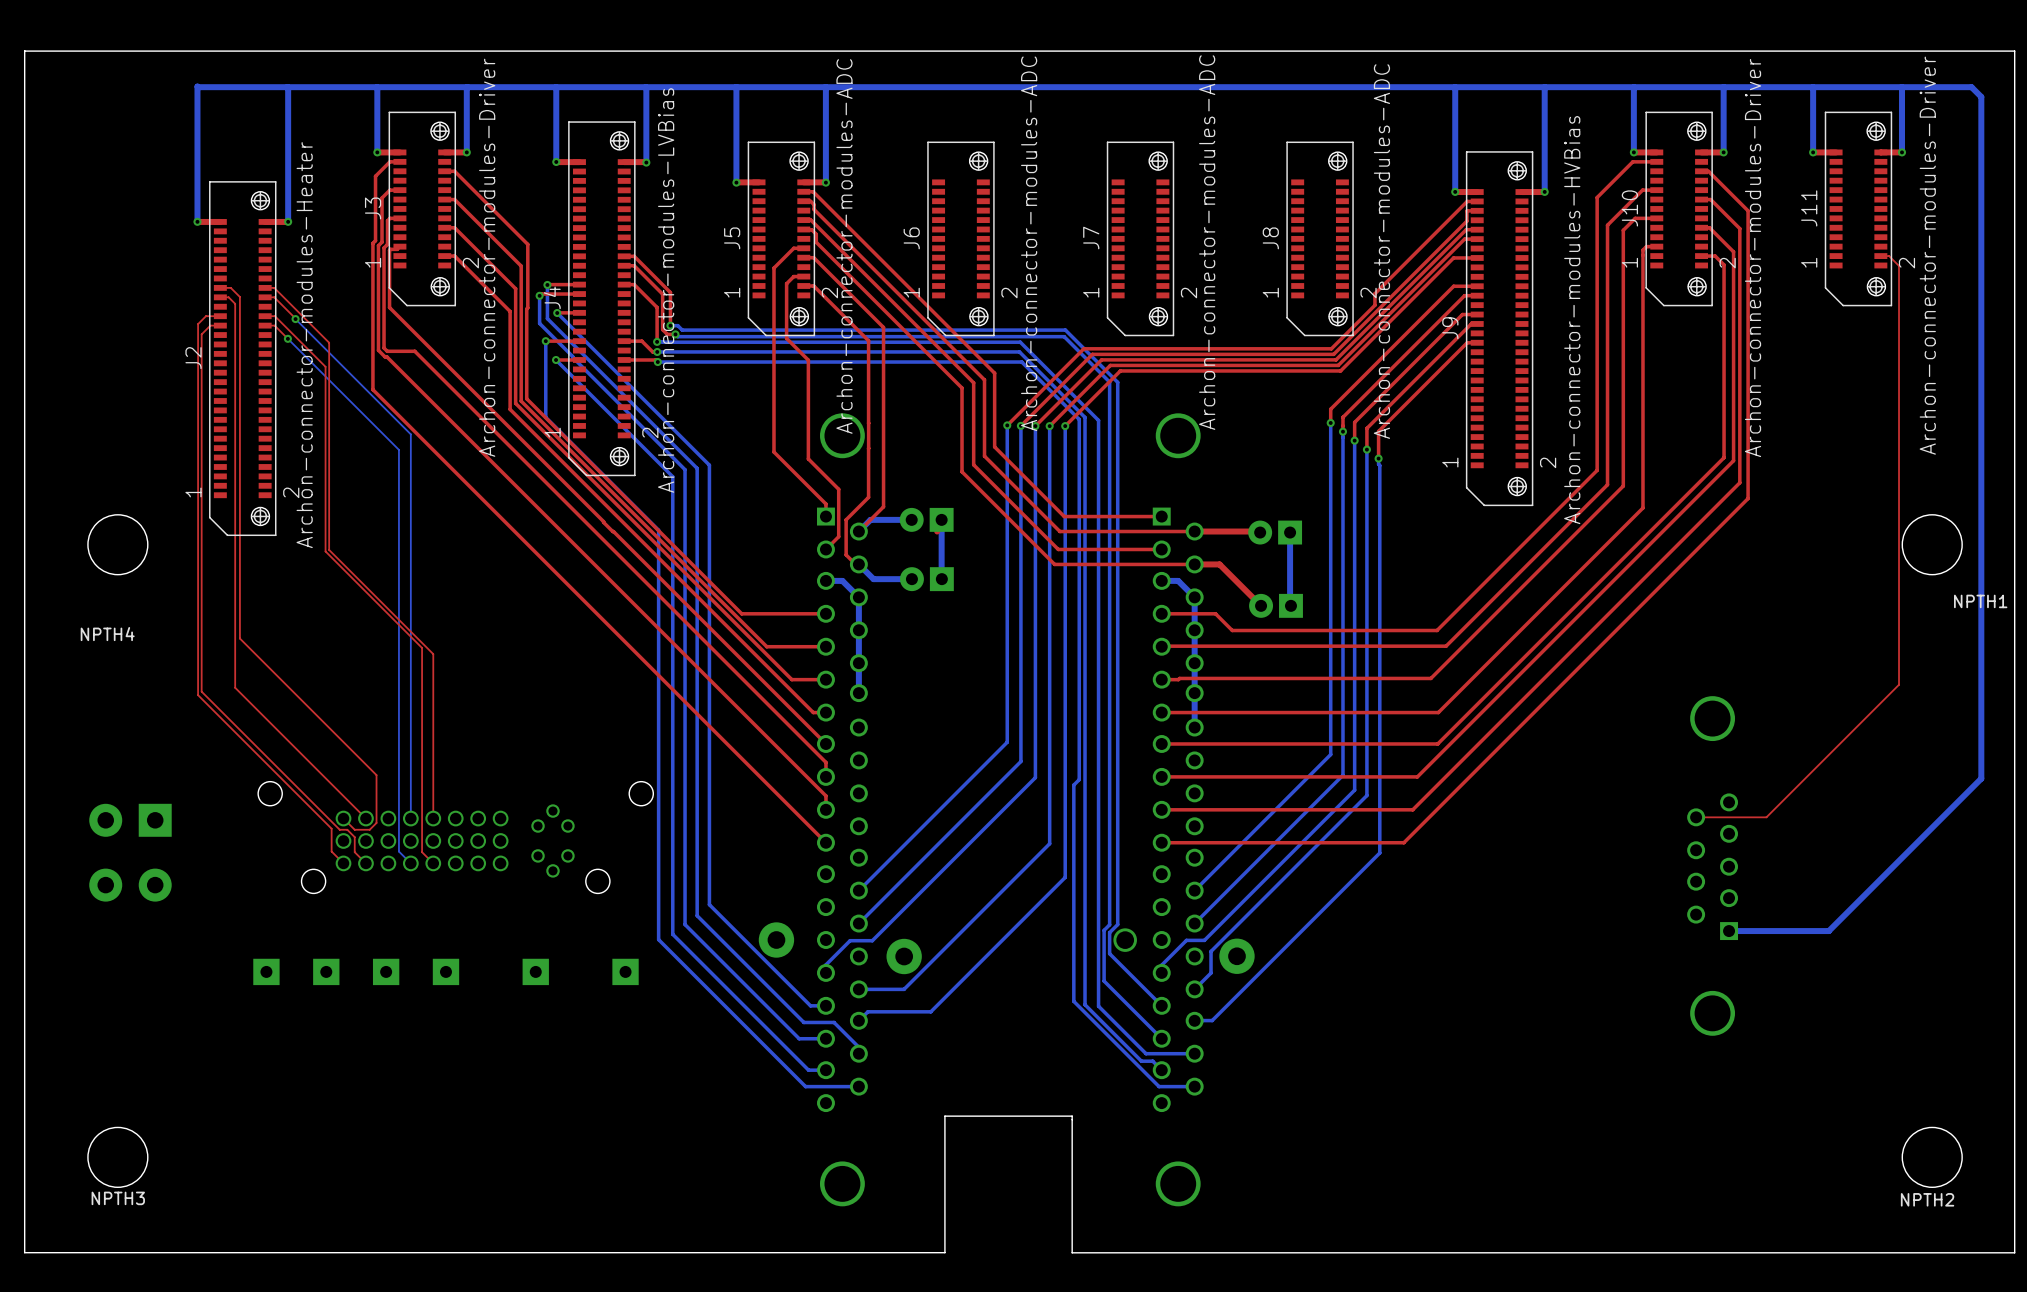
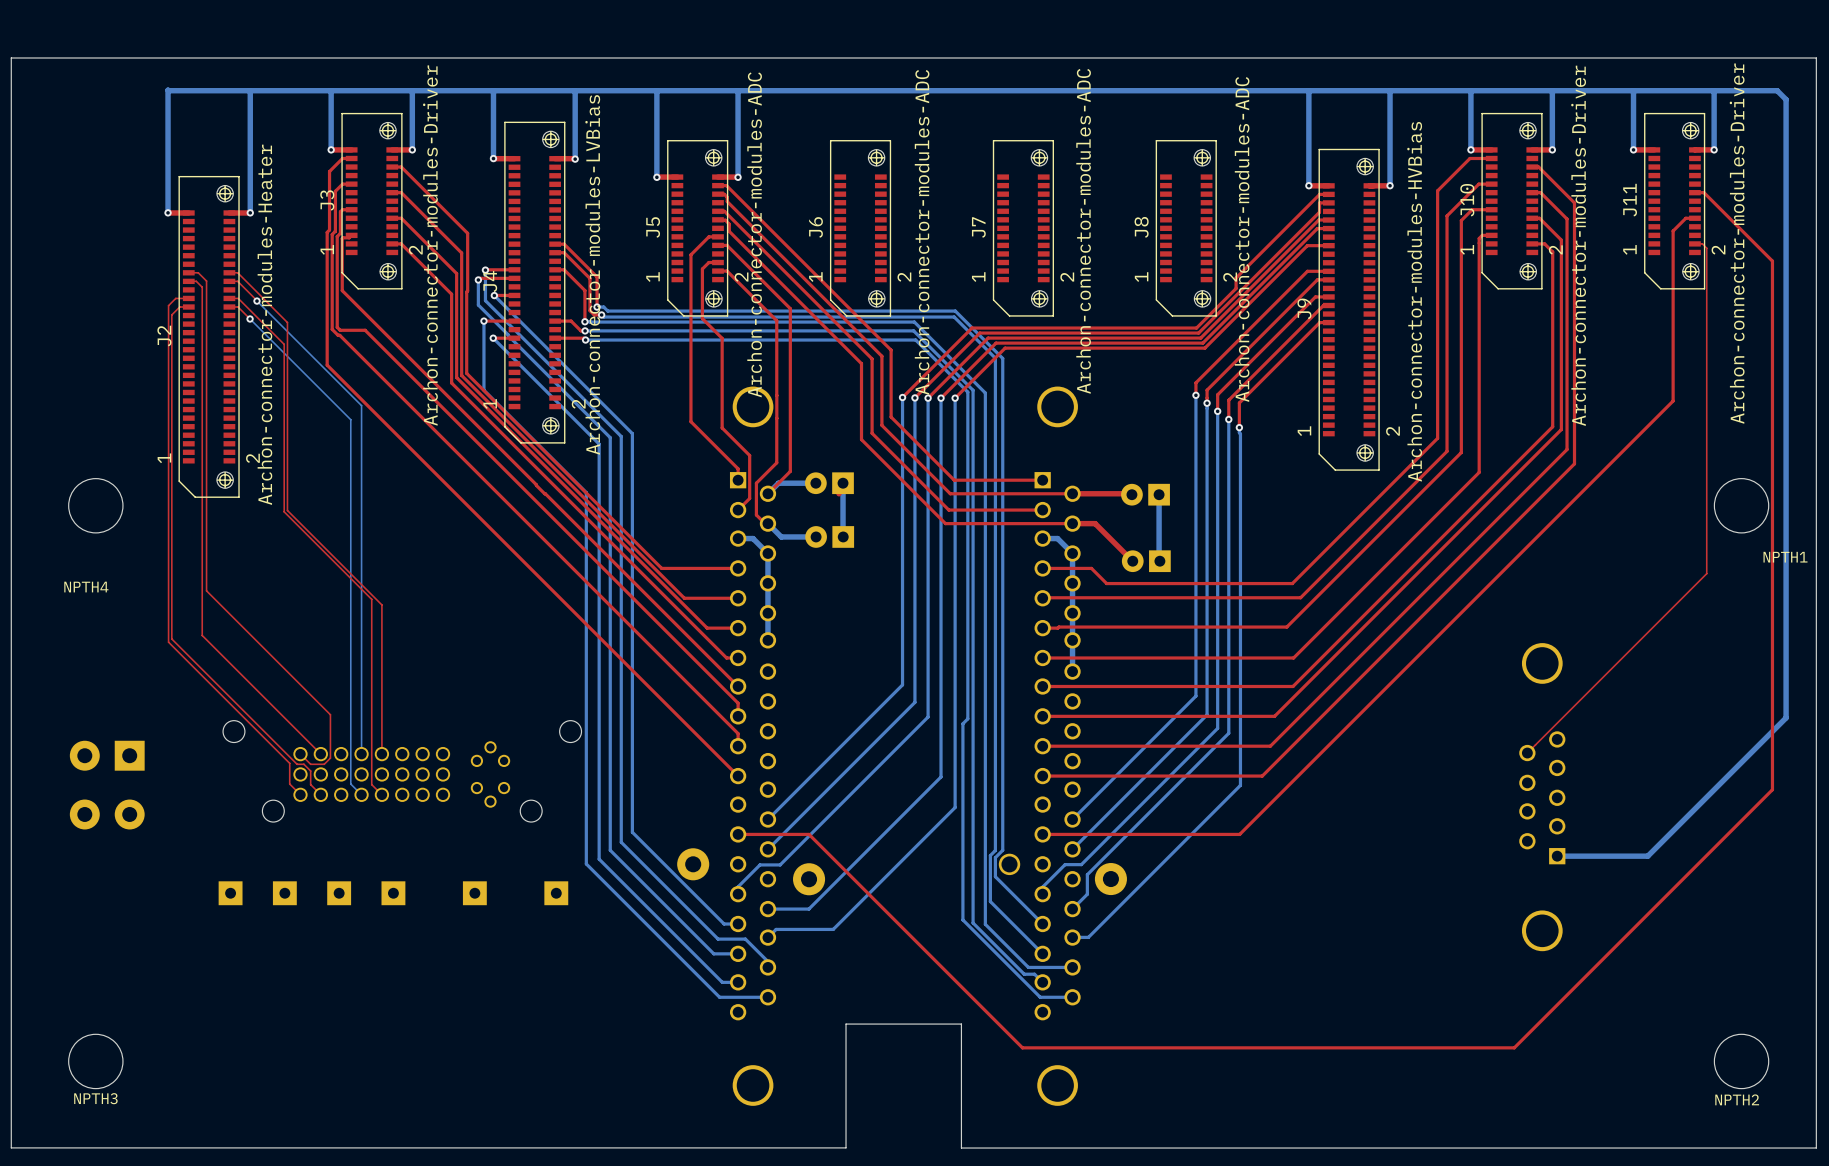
top track: none -> (1694, 192) (1704, 192) (1772, 261) (1772, 789) (1514, 1047) (1022, 1047) (809, 834) (738, 834)
top track: none -> (1694, 218) (1685, 218) (1673, 231) (1673, 401) (1239, 834) (1042, 834)
top track: (1893, 260) (1899, 265) (1899, 684) (1766, 817) (1696, 817) -> (1706, 248) (1706, 573) (1527, 753)

